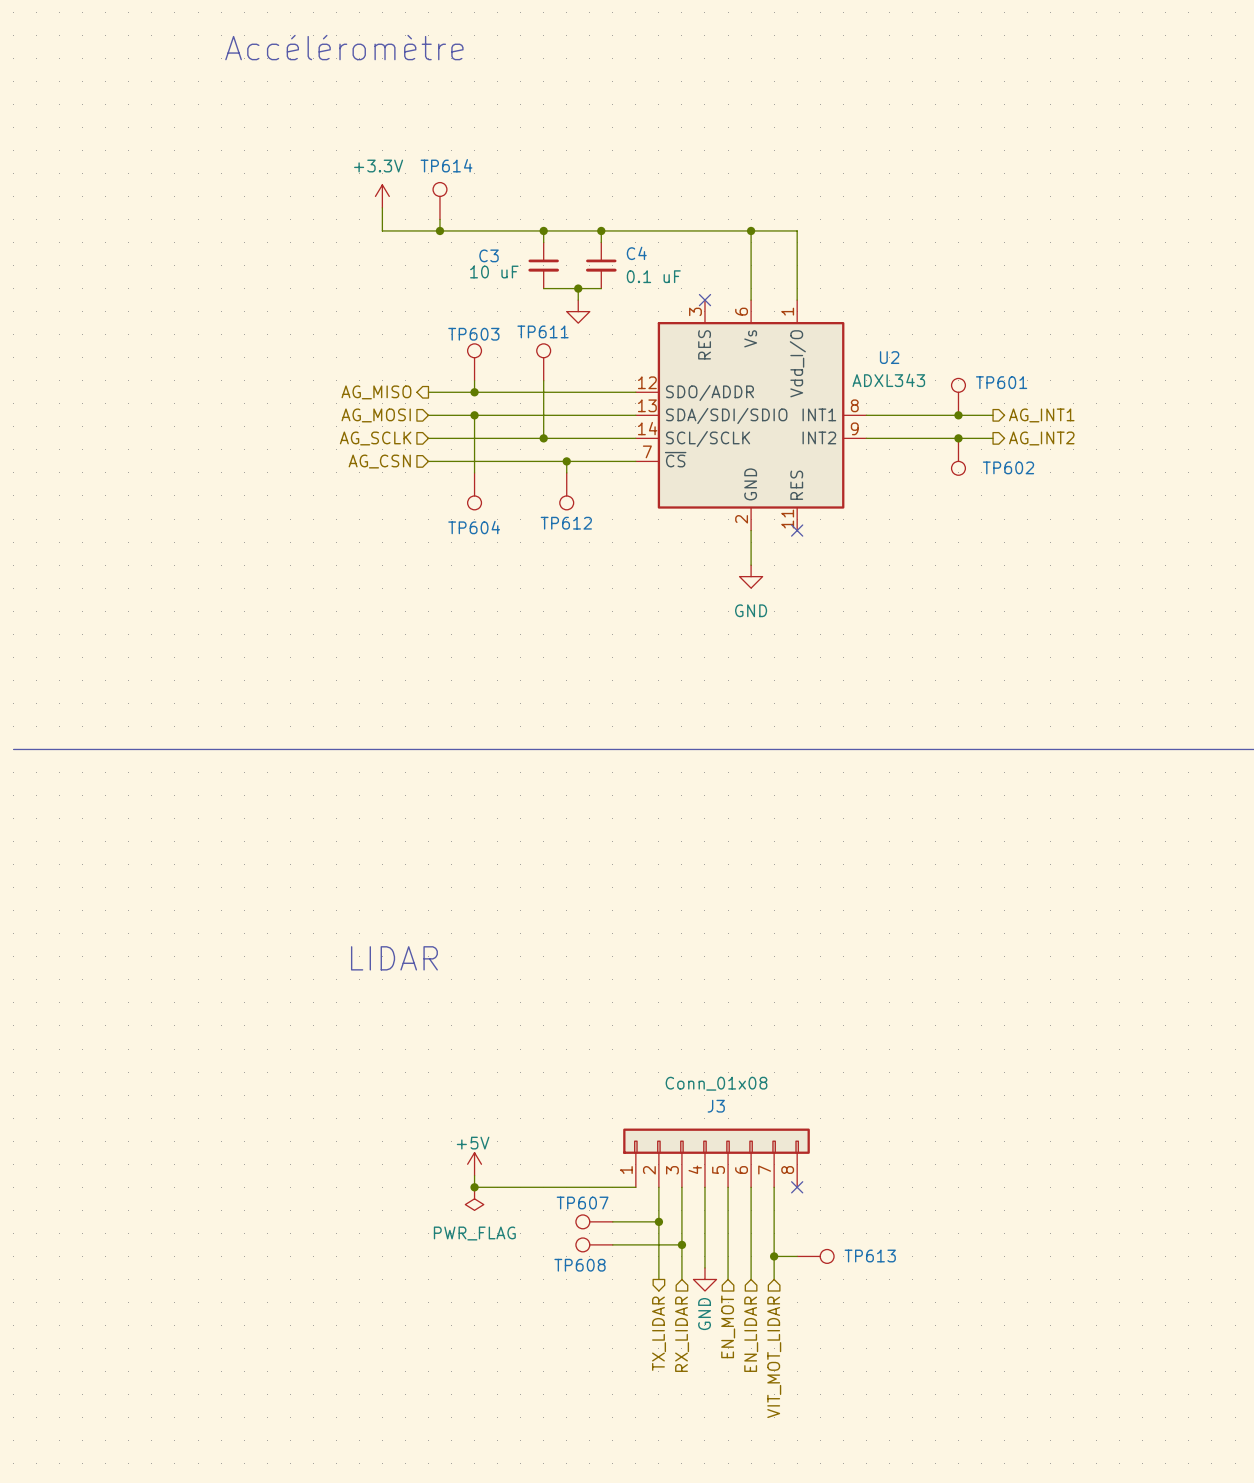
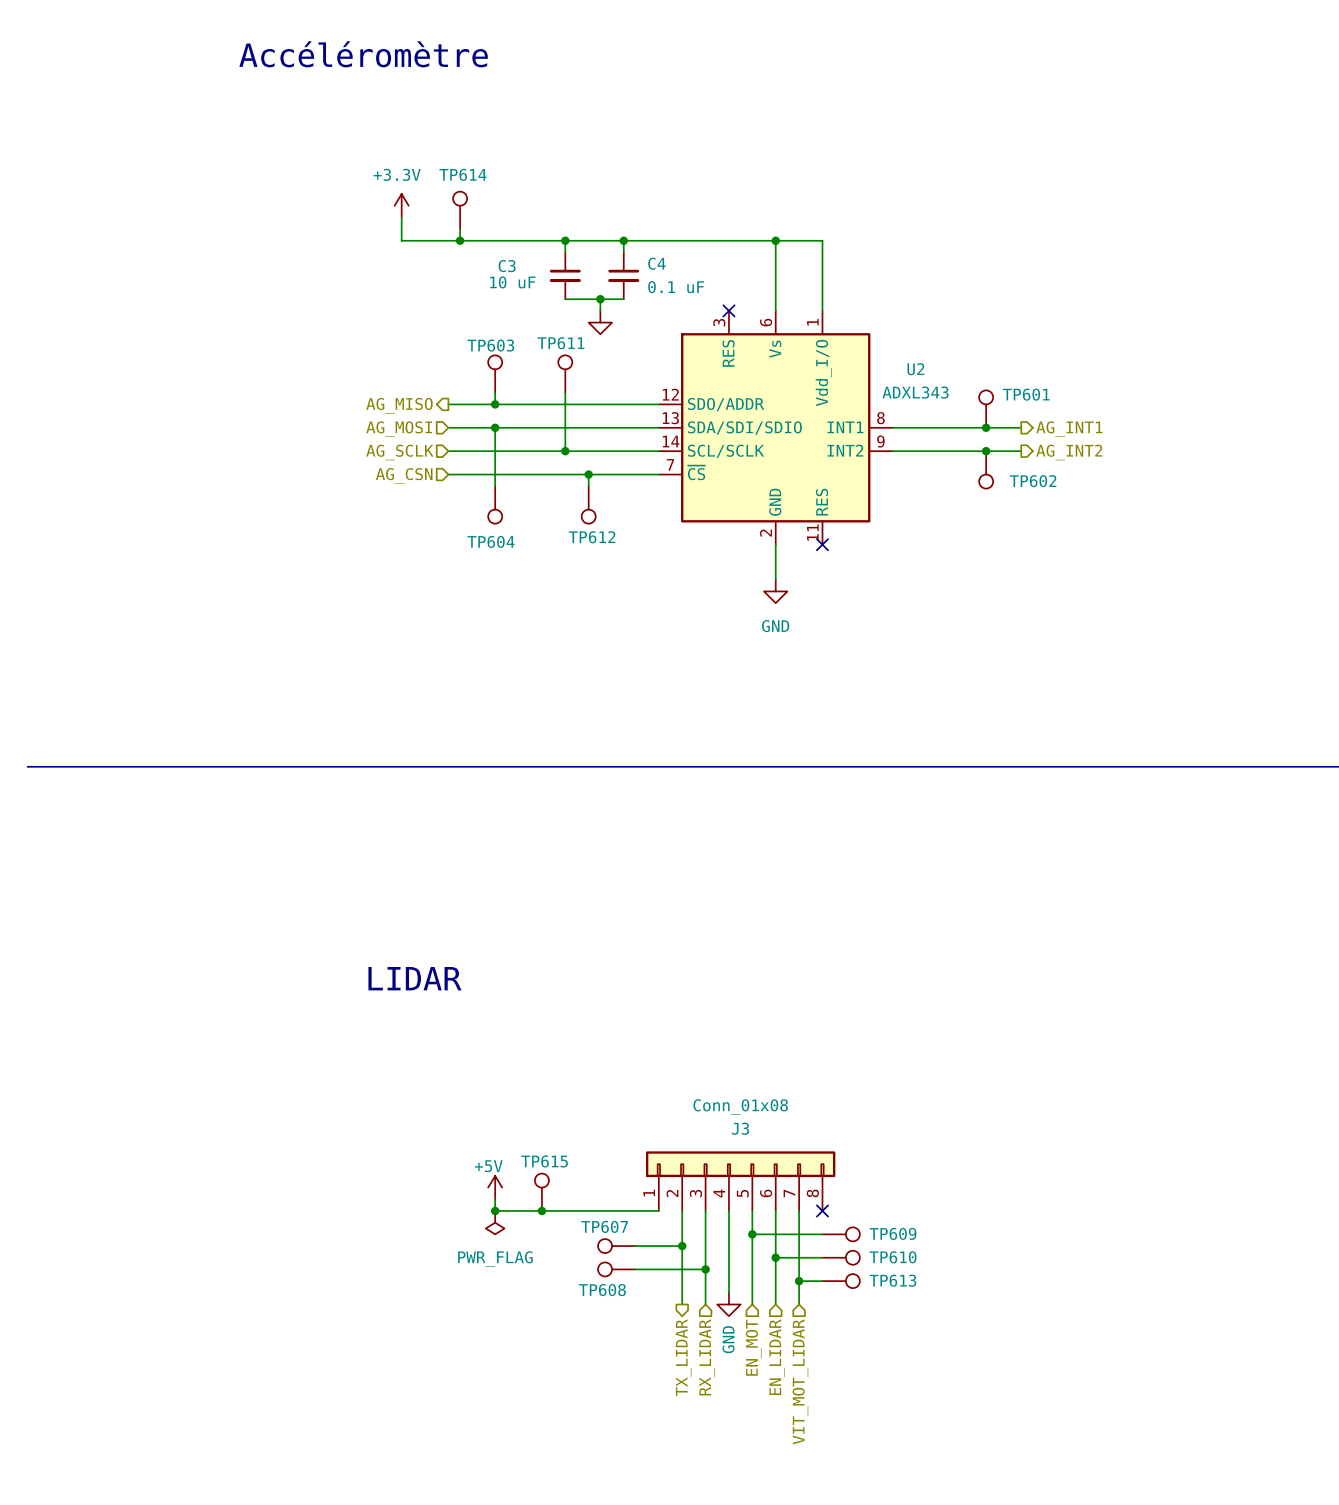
TP615: none -> (541, 1192)
junction: none -> (541, 1210)
wire: none -> (752, 1234) (822, 1234)
junction: none -> (752, 1234)
TP609: none -> (841, 1234)
wire: none -> (775, 1257) (822, 1257)
junction: none -> (775, 1257)
TP610: none -> (841, 1257)

